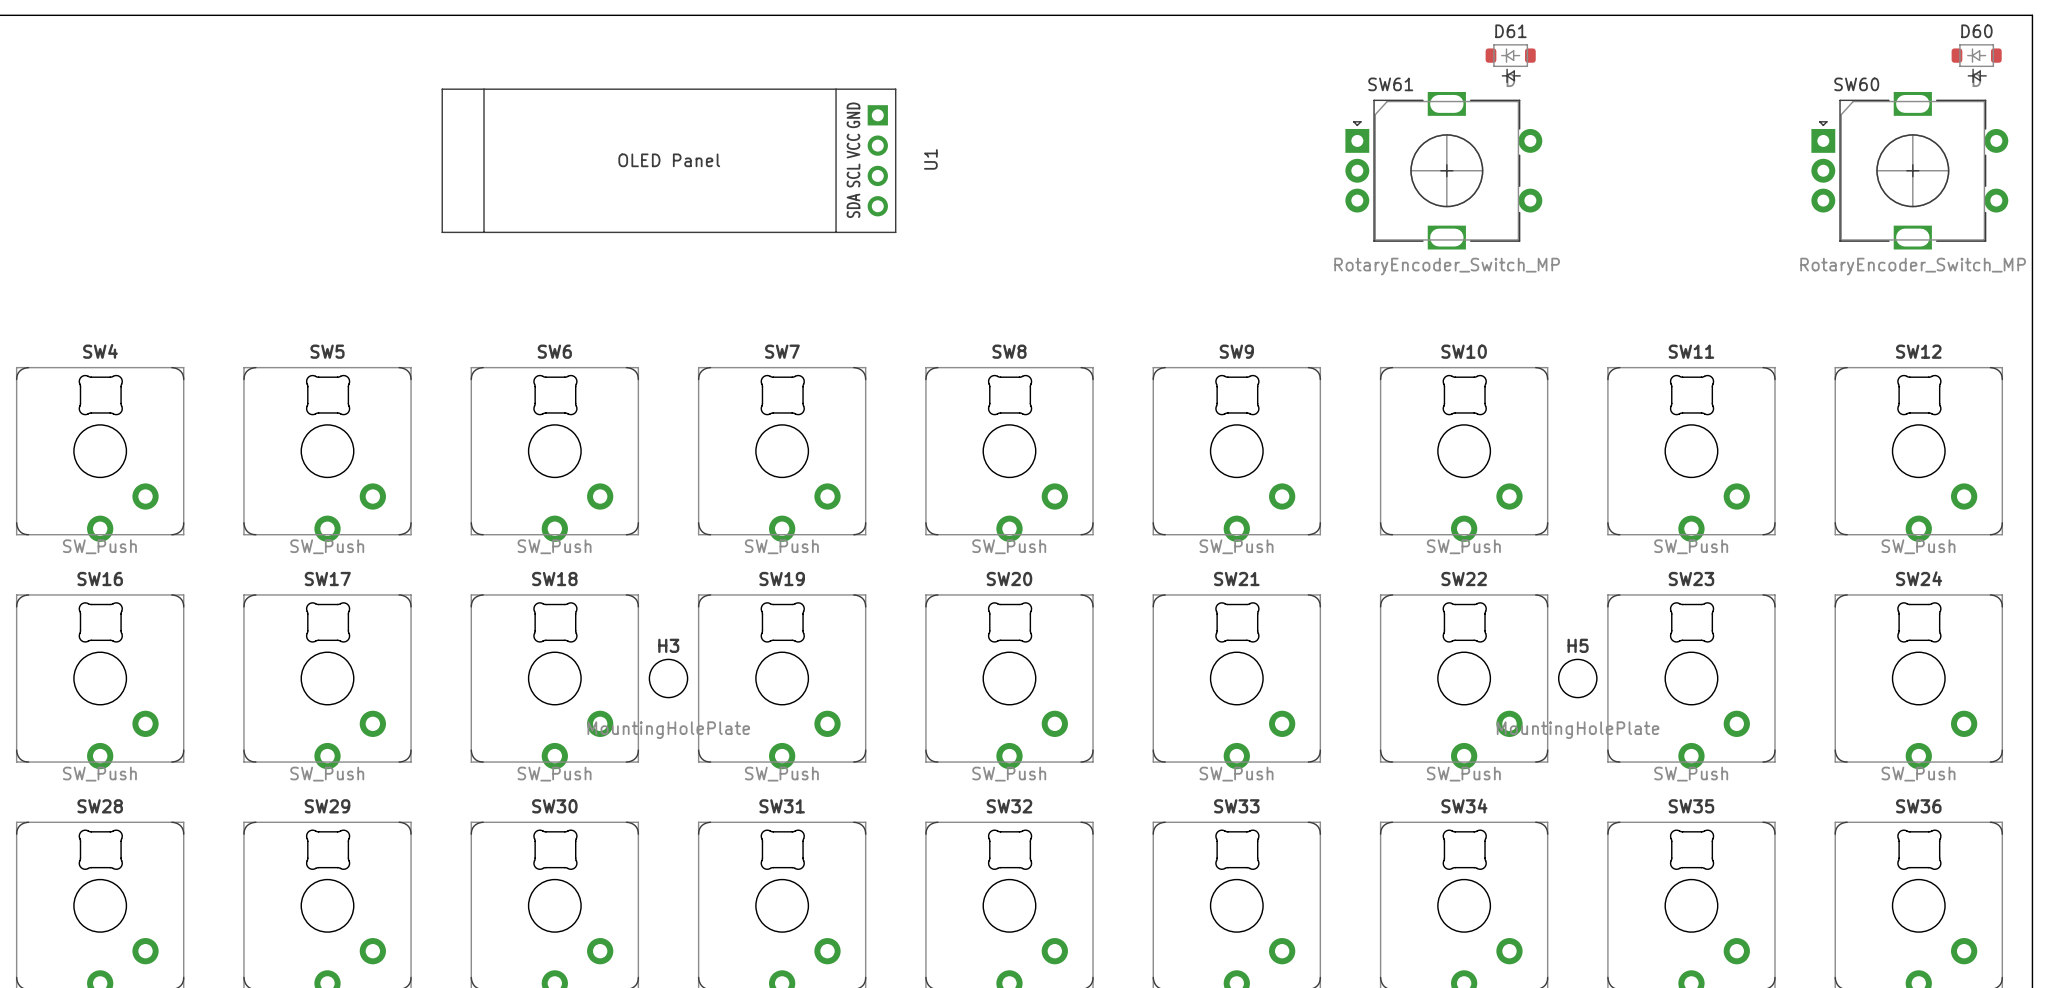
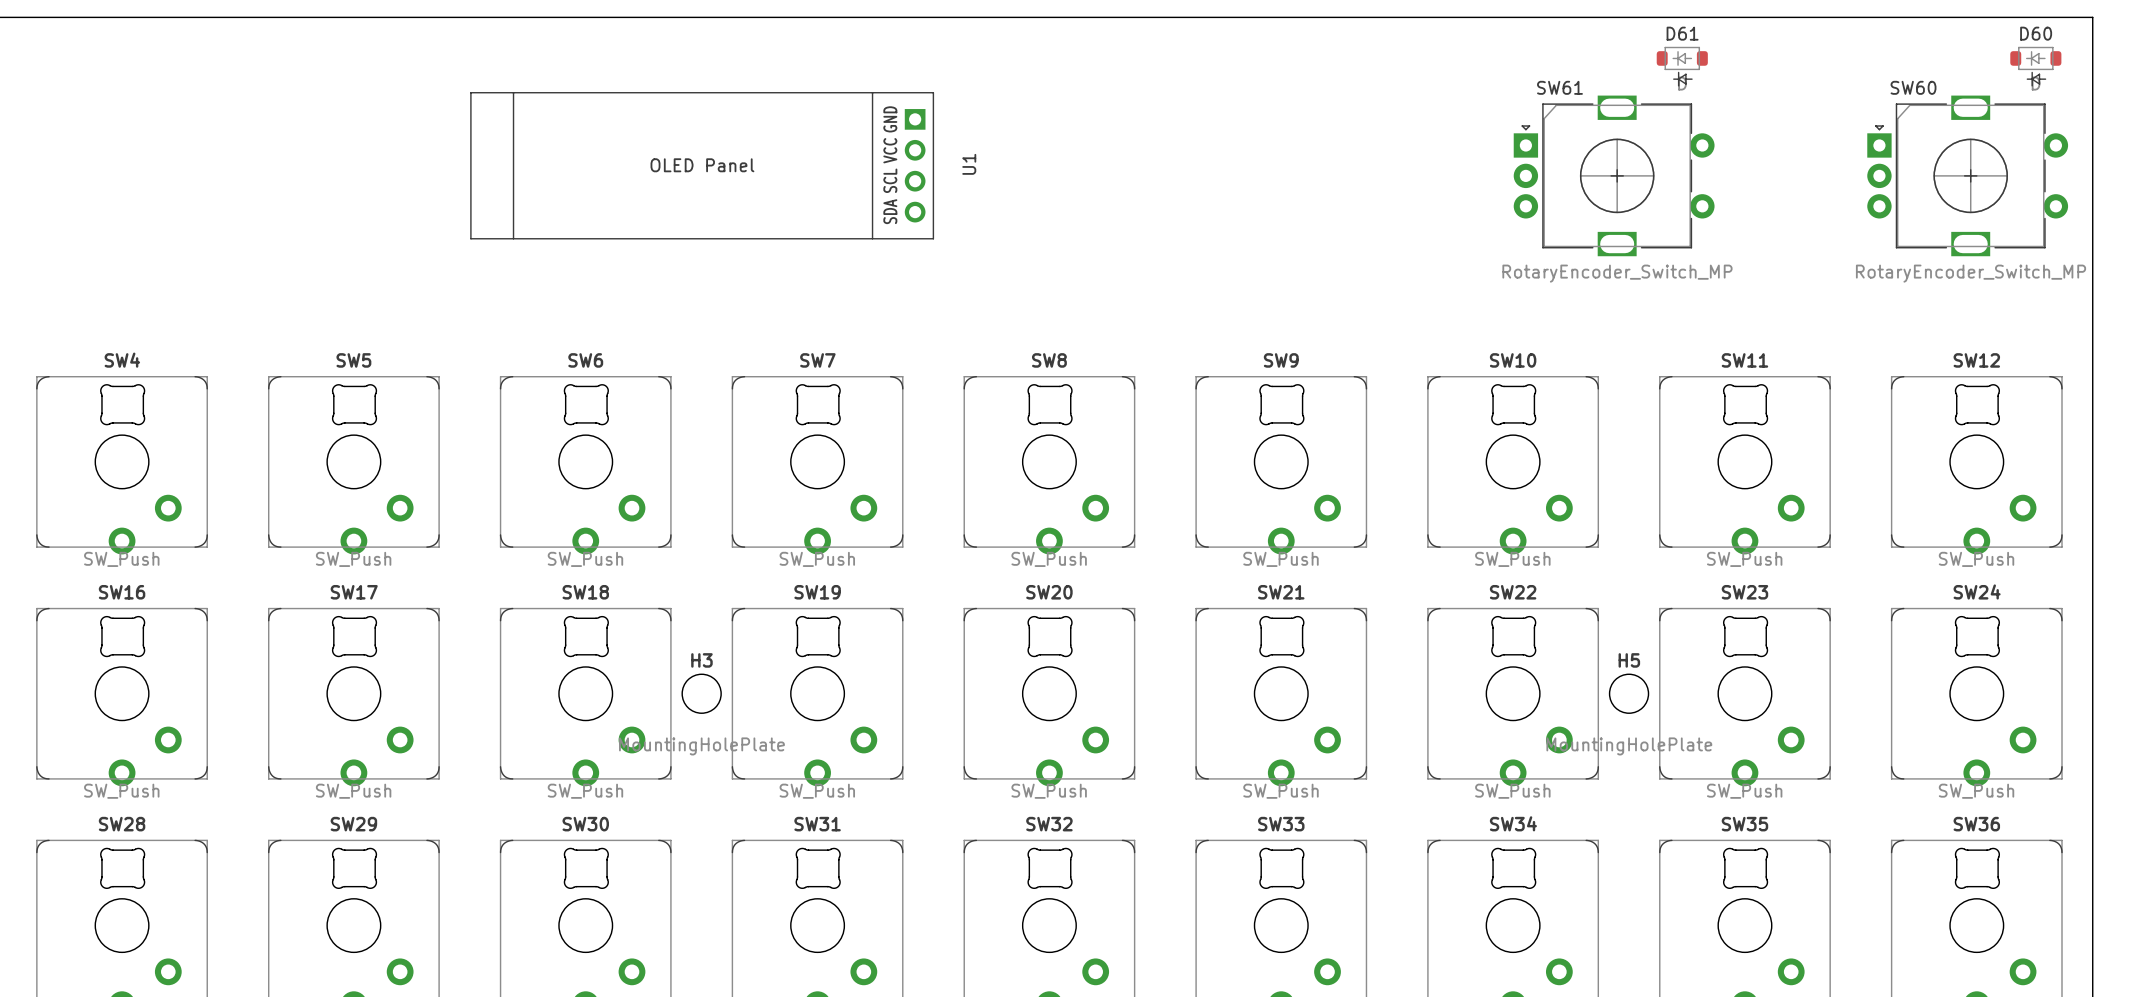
D61 position: (1510, 63) -> (1682, 66)
SW61 position: (1443, 170) -> (1614, 175)

